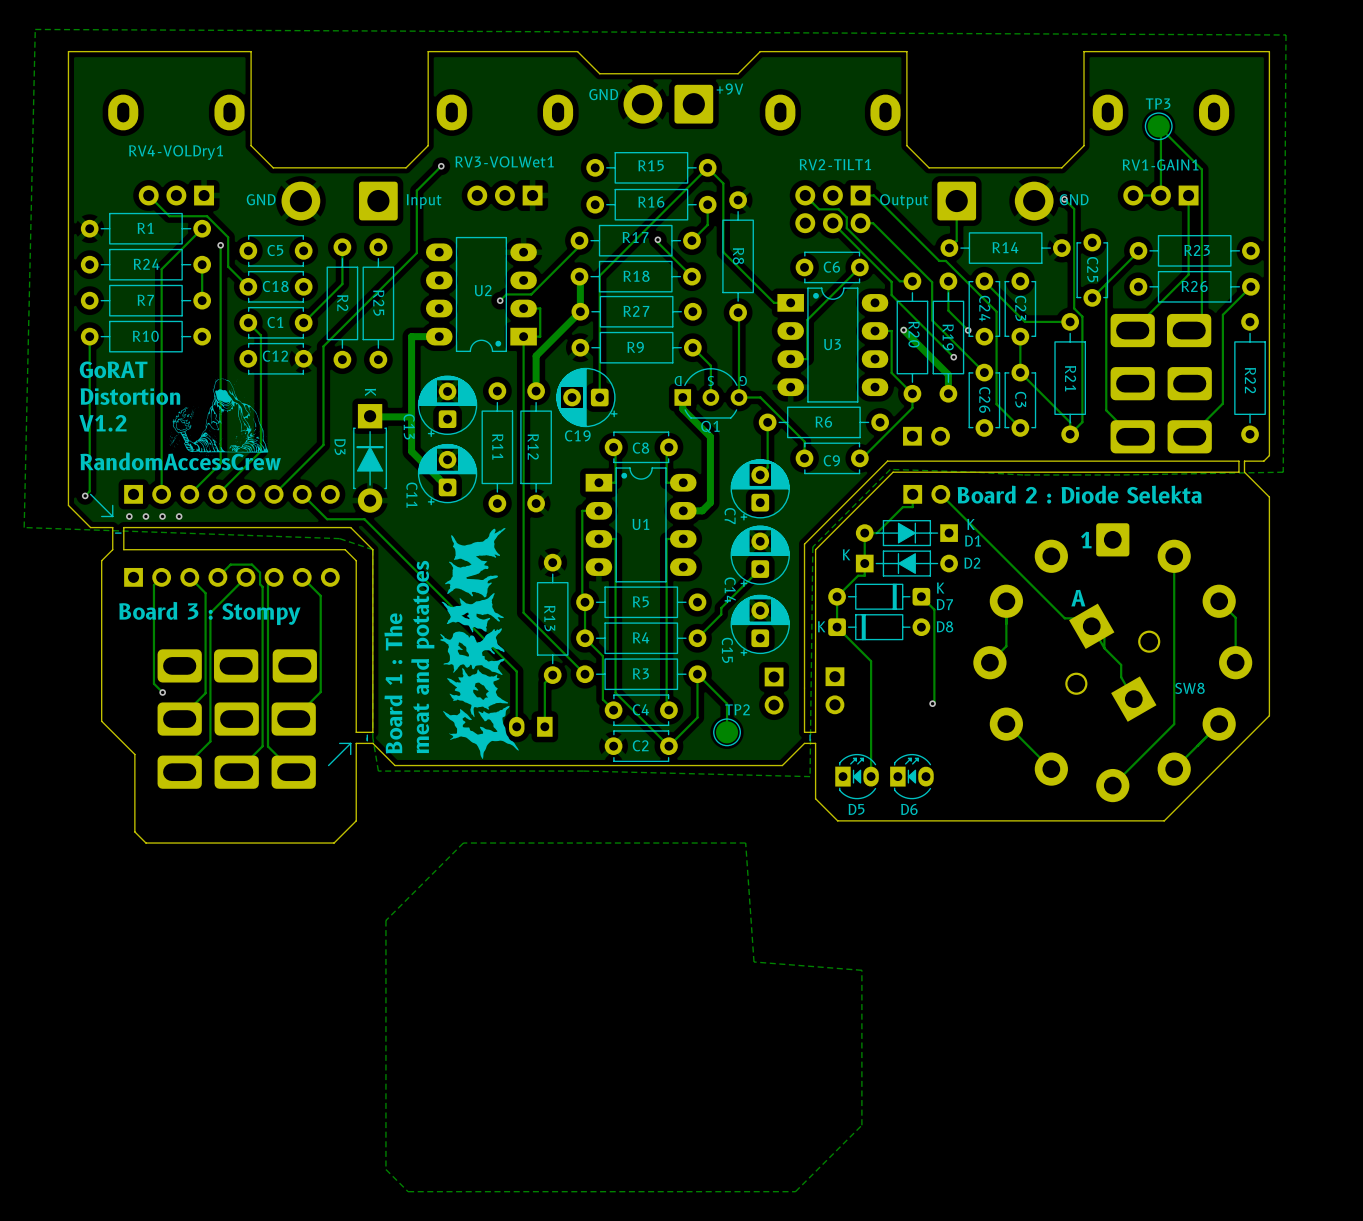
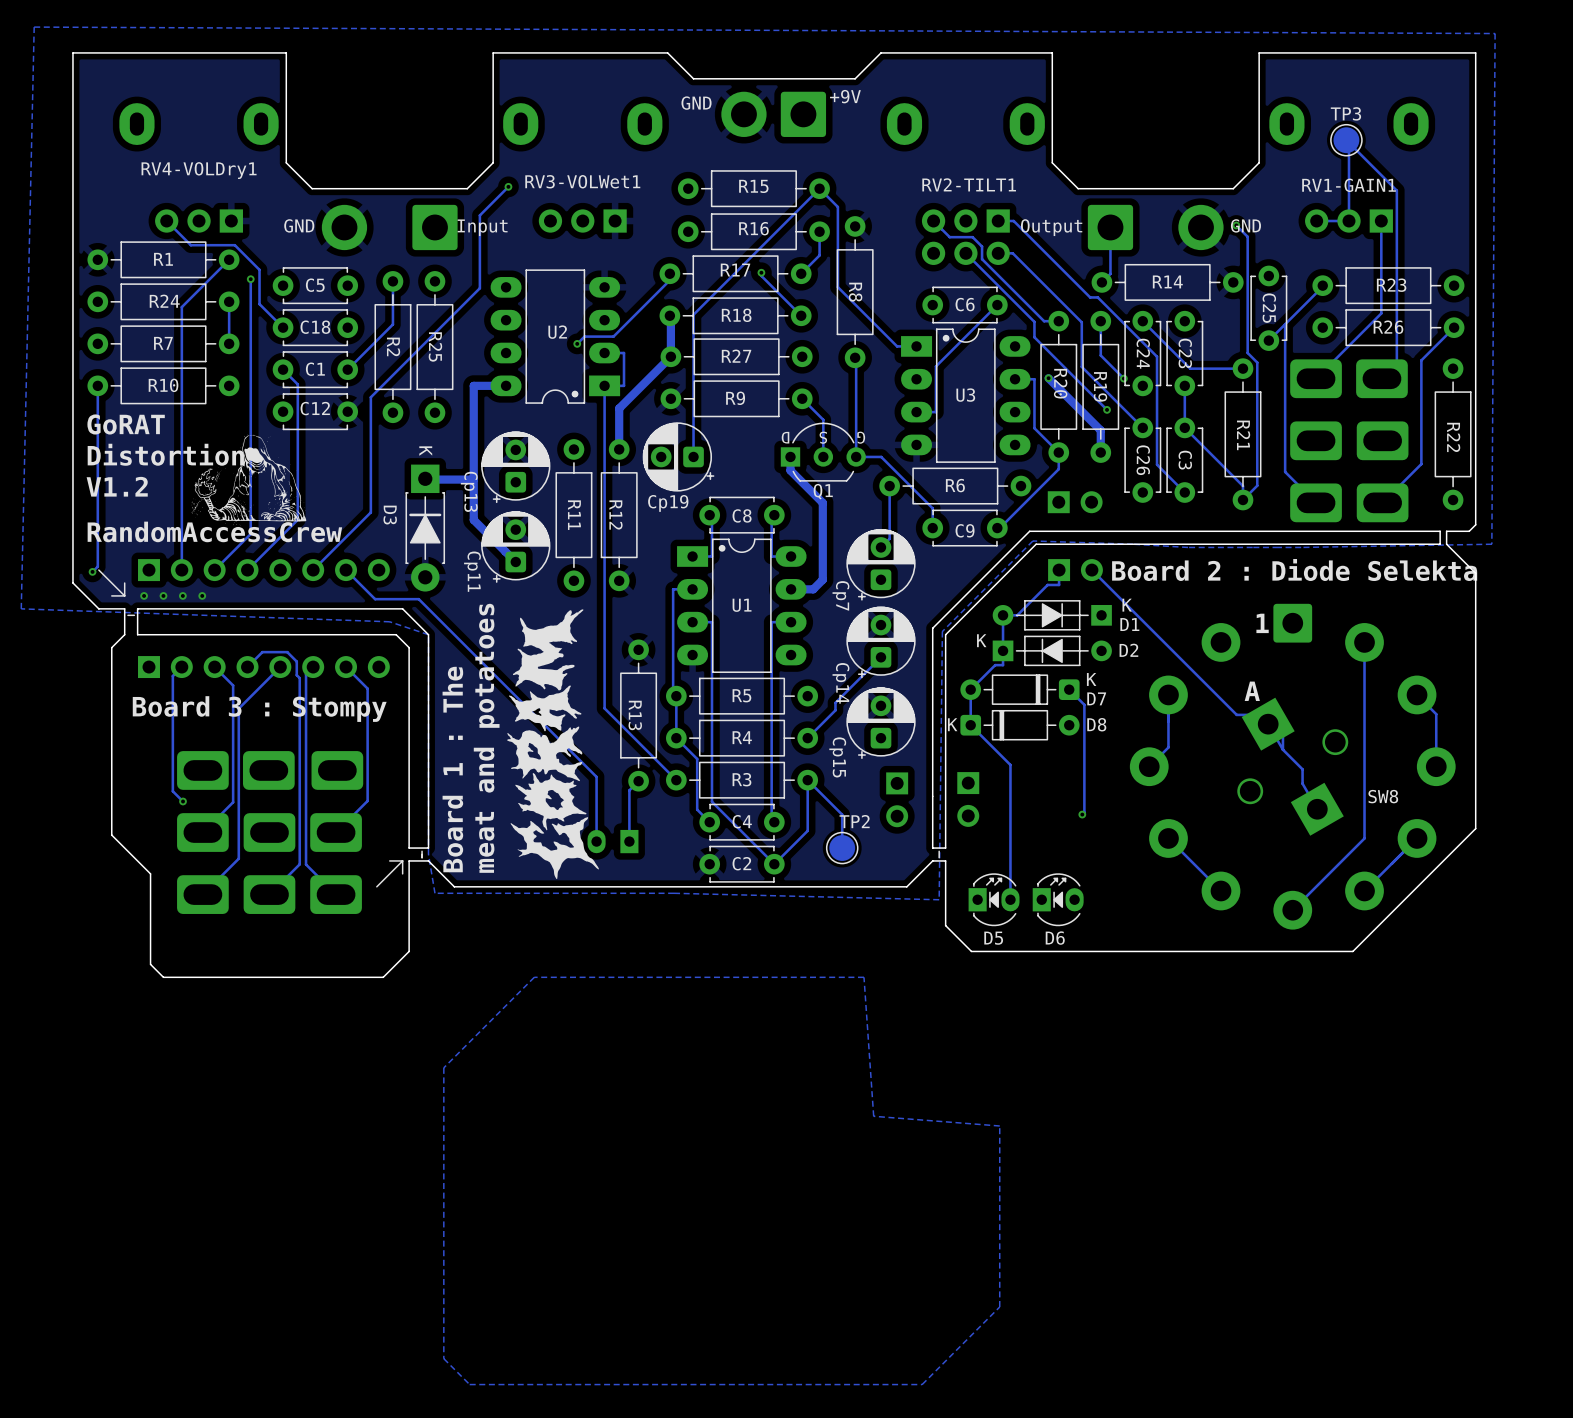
C13 name: C13 (409, 426) -> Cp13 (469, 491)
C19 name: C19 (577, 435) -> Cp19 (668, 503)
C11 name: C11 (411, 495) -> Cp11 (472, 571)
C7 name: C7 (730, 516) -> Cp7 (840, 595)
C14 name: C14 (730, 590) -> Cp14 (840, 683)
C15 name: C15 (727, 650) -> Cp15 (837, 757)

